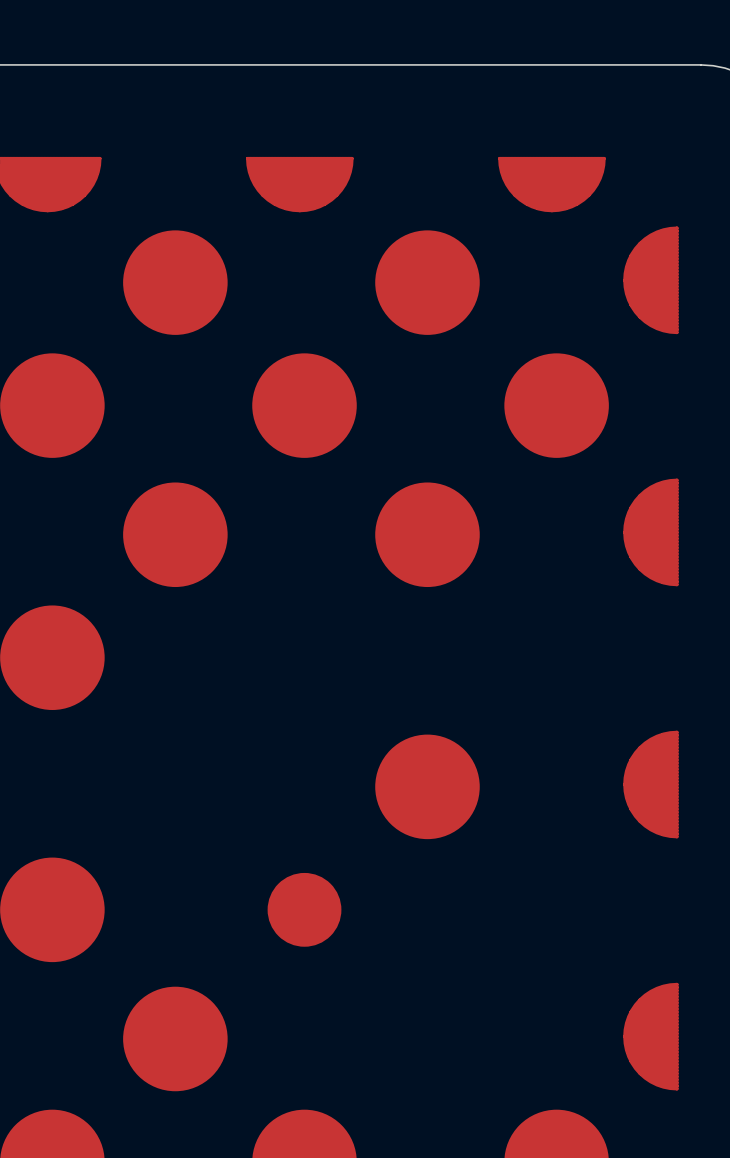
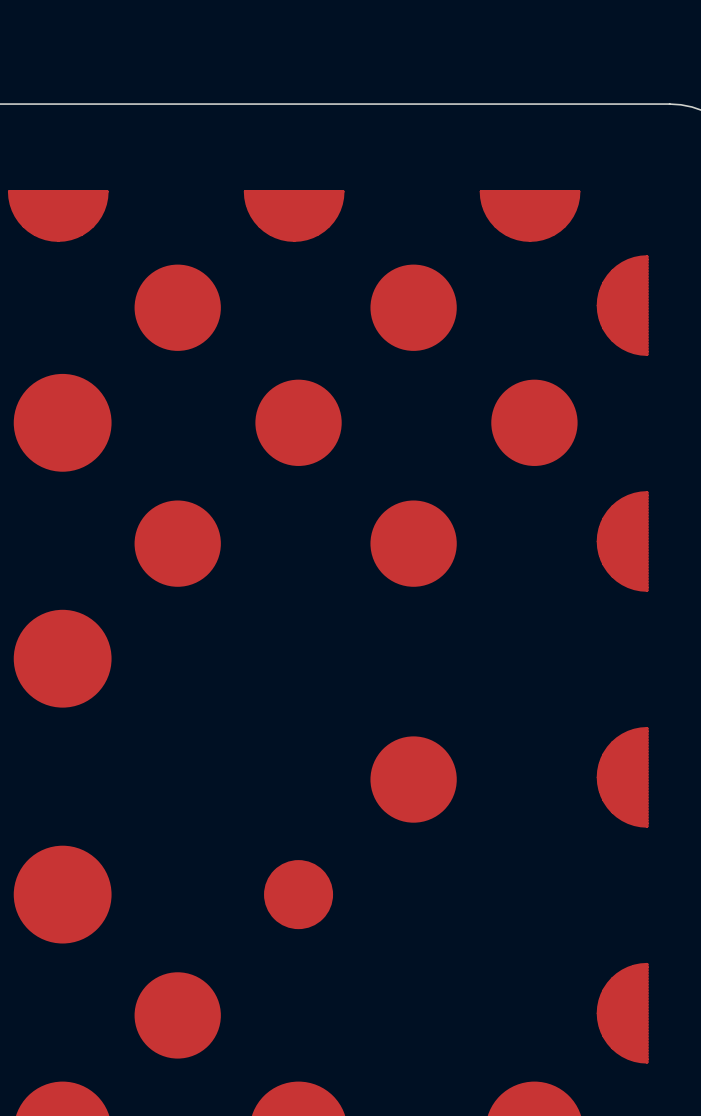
part footprint: [123, 230, 228, 335] -> [134, 264, 221, 351]
part footprint: [375, 230, 480, 335] -> [370, 264, 457, 351]
part footprint: [252, 353, 357, 458] -> [255, 379, 342, 466]
part footprint: [504, 353, 609, 458] -> [491, 379, 578, 466]
part footprint: [123, 482, 228, 588] -> [134, 500, 221, 587]
part footprint: [375, 482, 480, 588] -> [370, 500, 457, 587]
part footprint: [375, 734, 480, 840] -> [370, 736, 457, 823]
part footprint: [123, 986, 228, 1092] -> [134, 972, 221, 1059]

